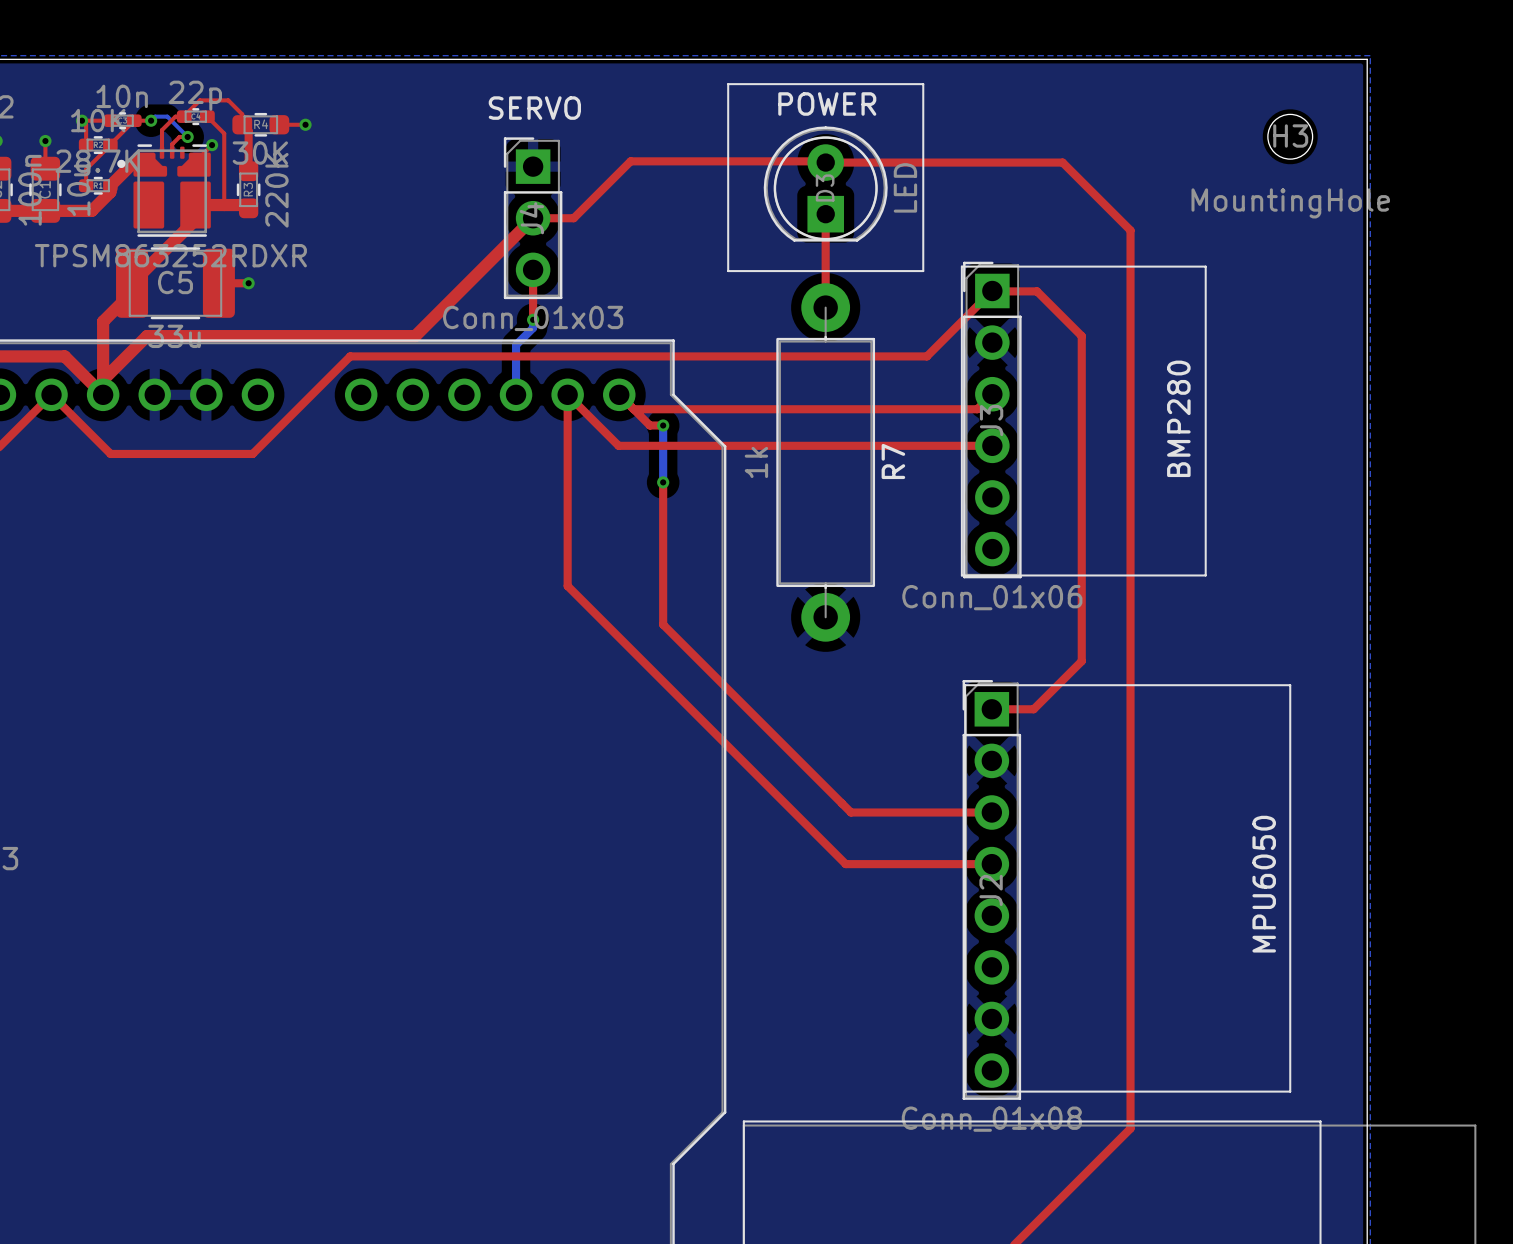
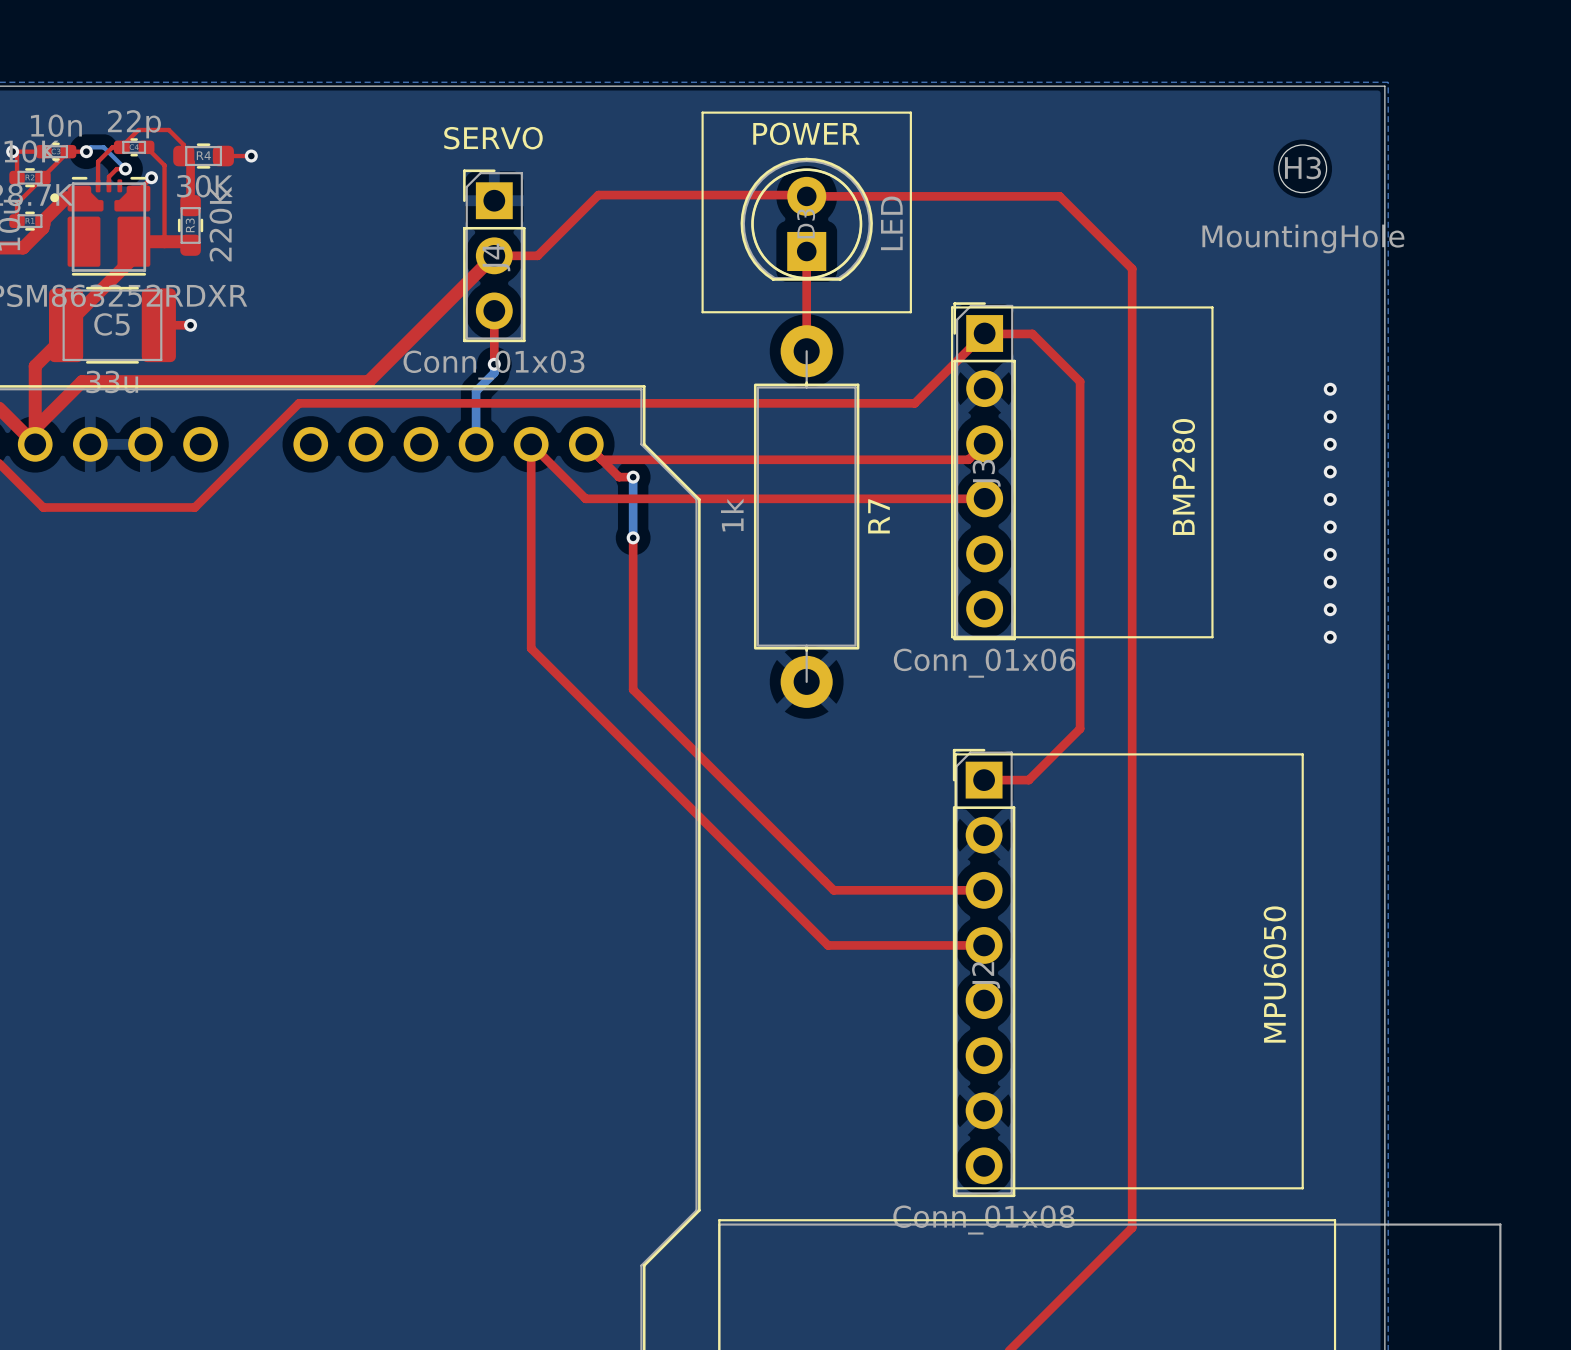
via: none -> (1330, 389)
via: none -> (1330, 416)
via: none -> (1330, 444)
via: none -> (1330, 471)
via: none -> (1330, 499)
via: none -> (1330, 527)
via: none -> (1330, 554)
via: none -> (1330, 582)
via: none -> (1330, 609)
via: none -> (1330, 637)

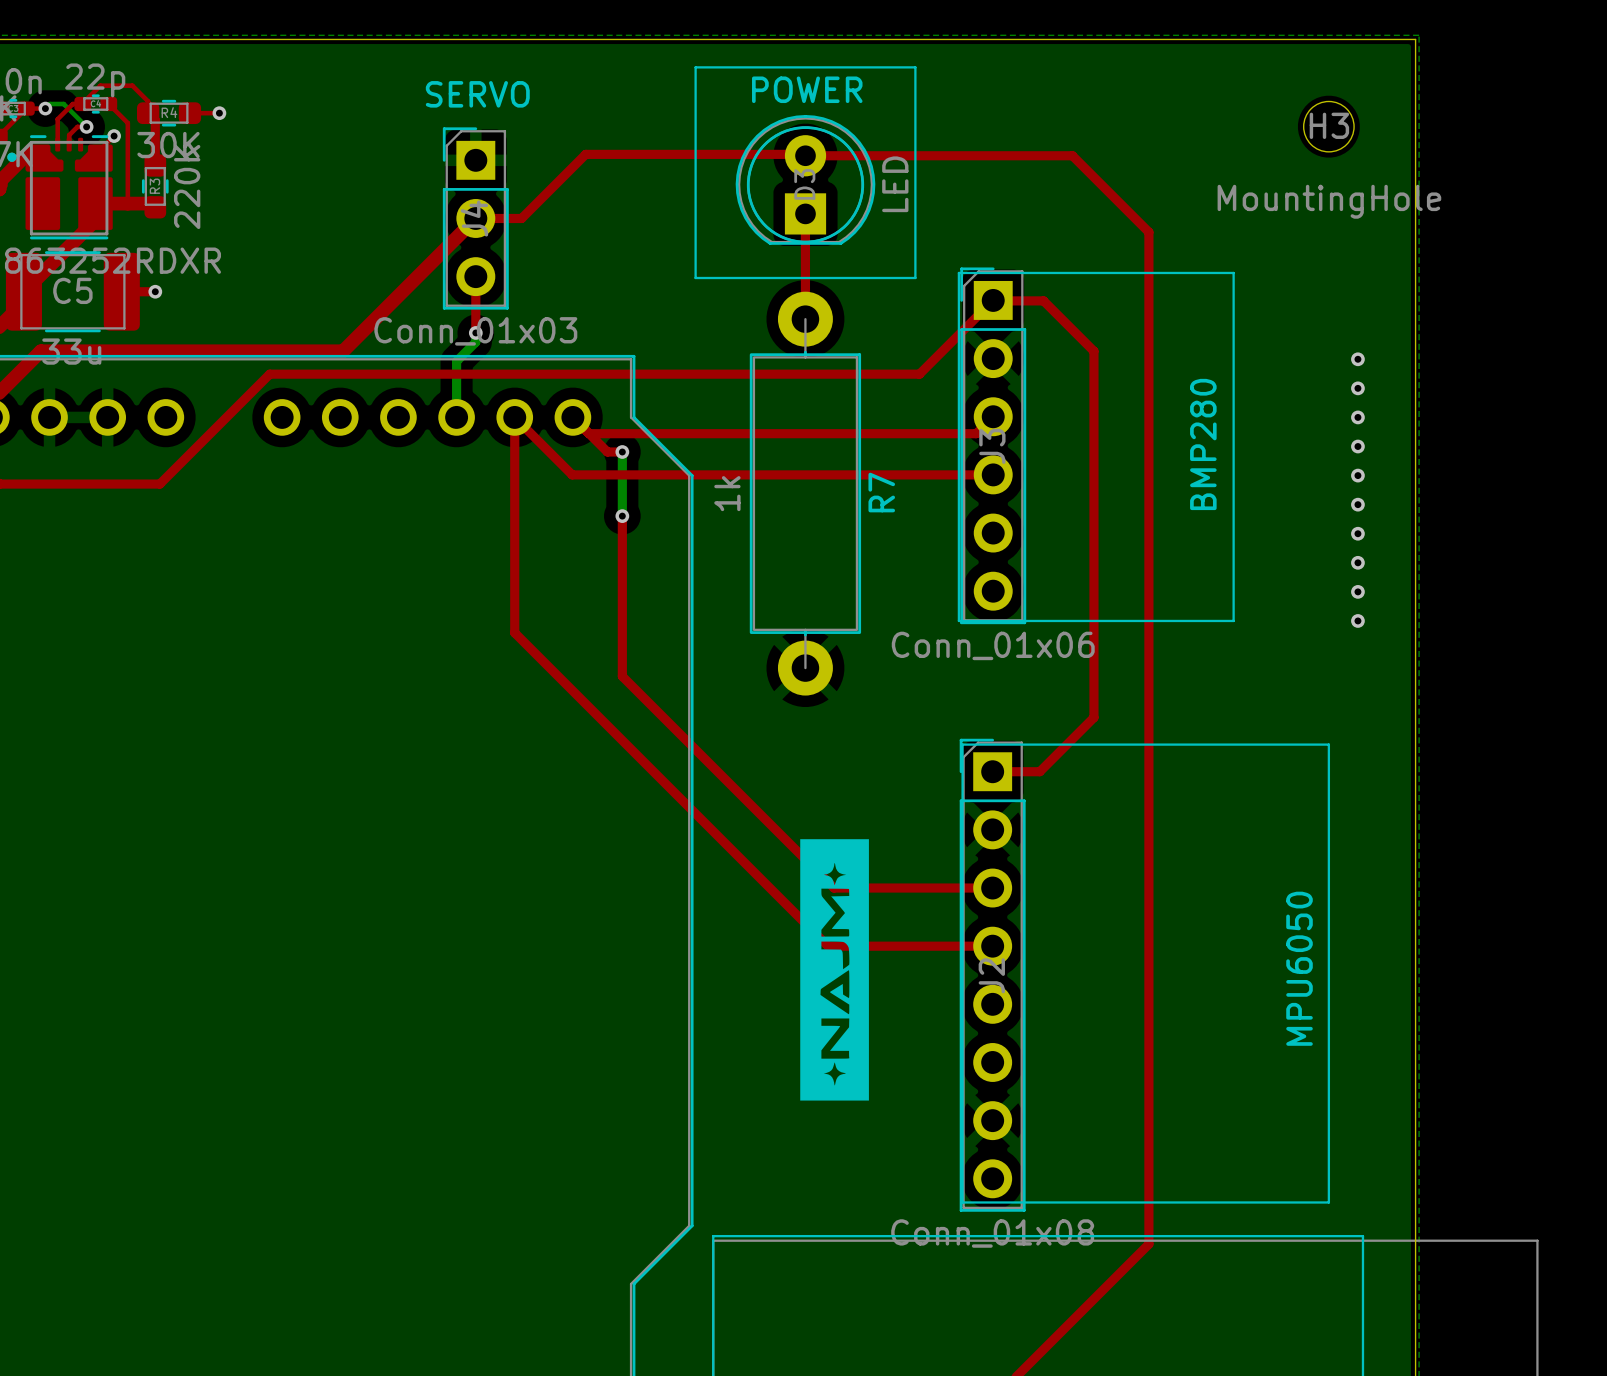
drawing: none -> [800, 839, 869, 1101]

